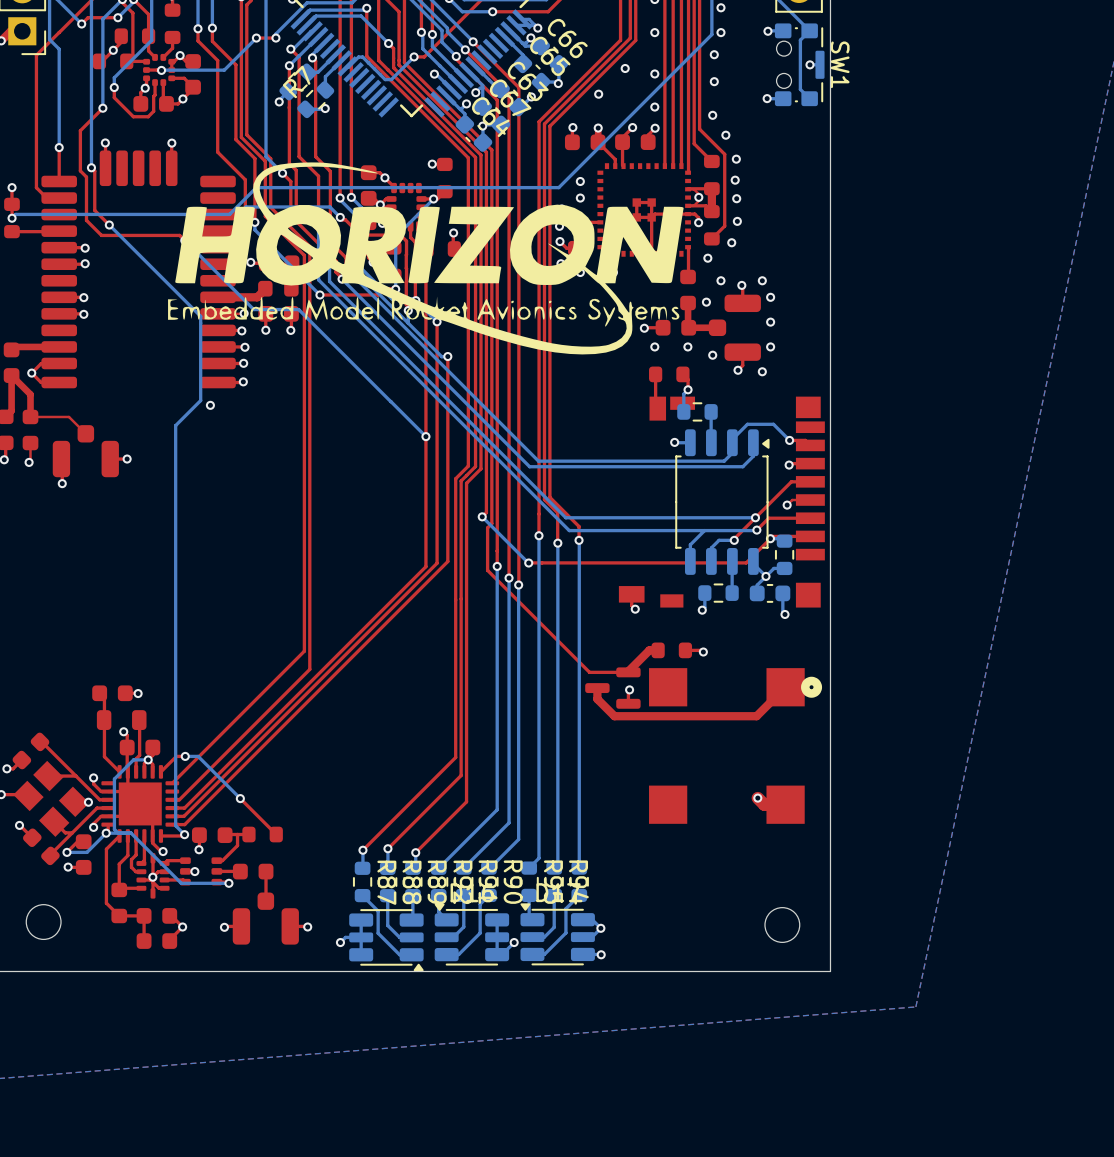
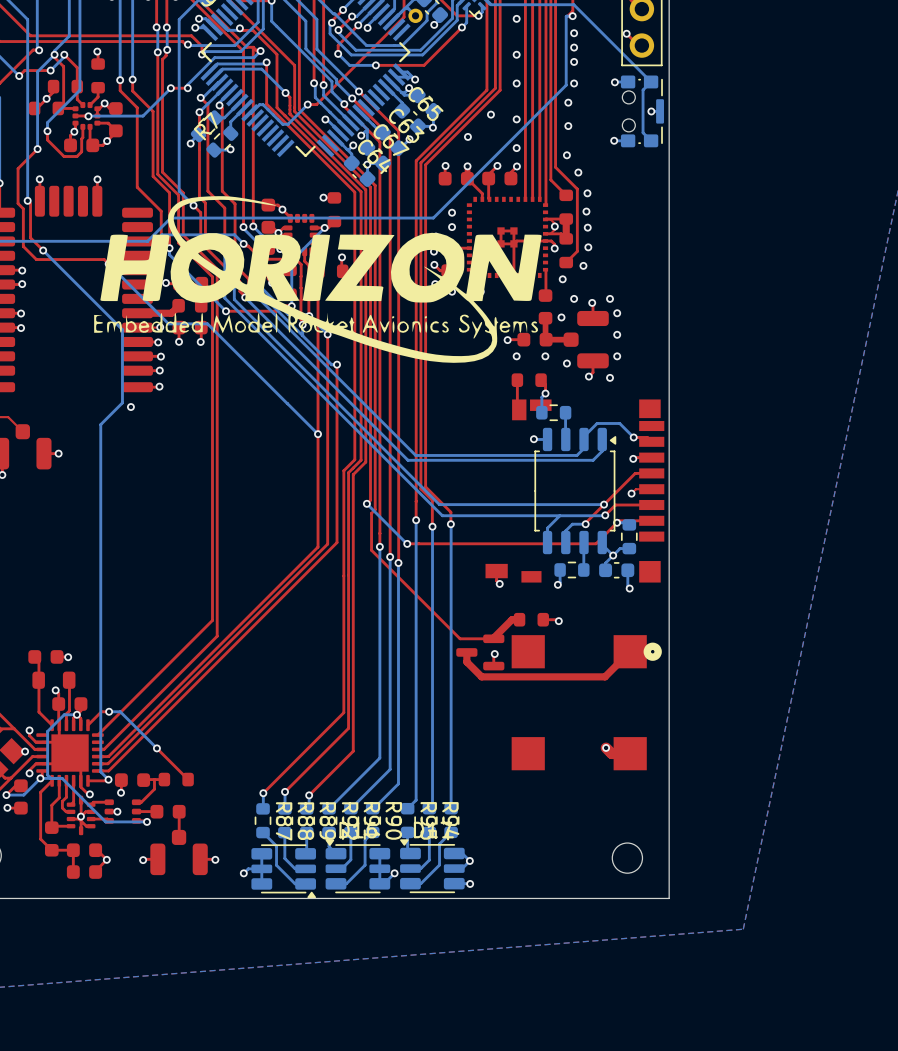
C66 name: C66 (567, 38) -> none
SW1 name: SW1 (840, 64) -> none

